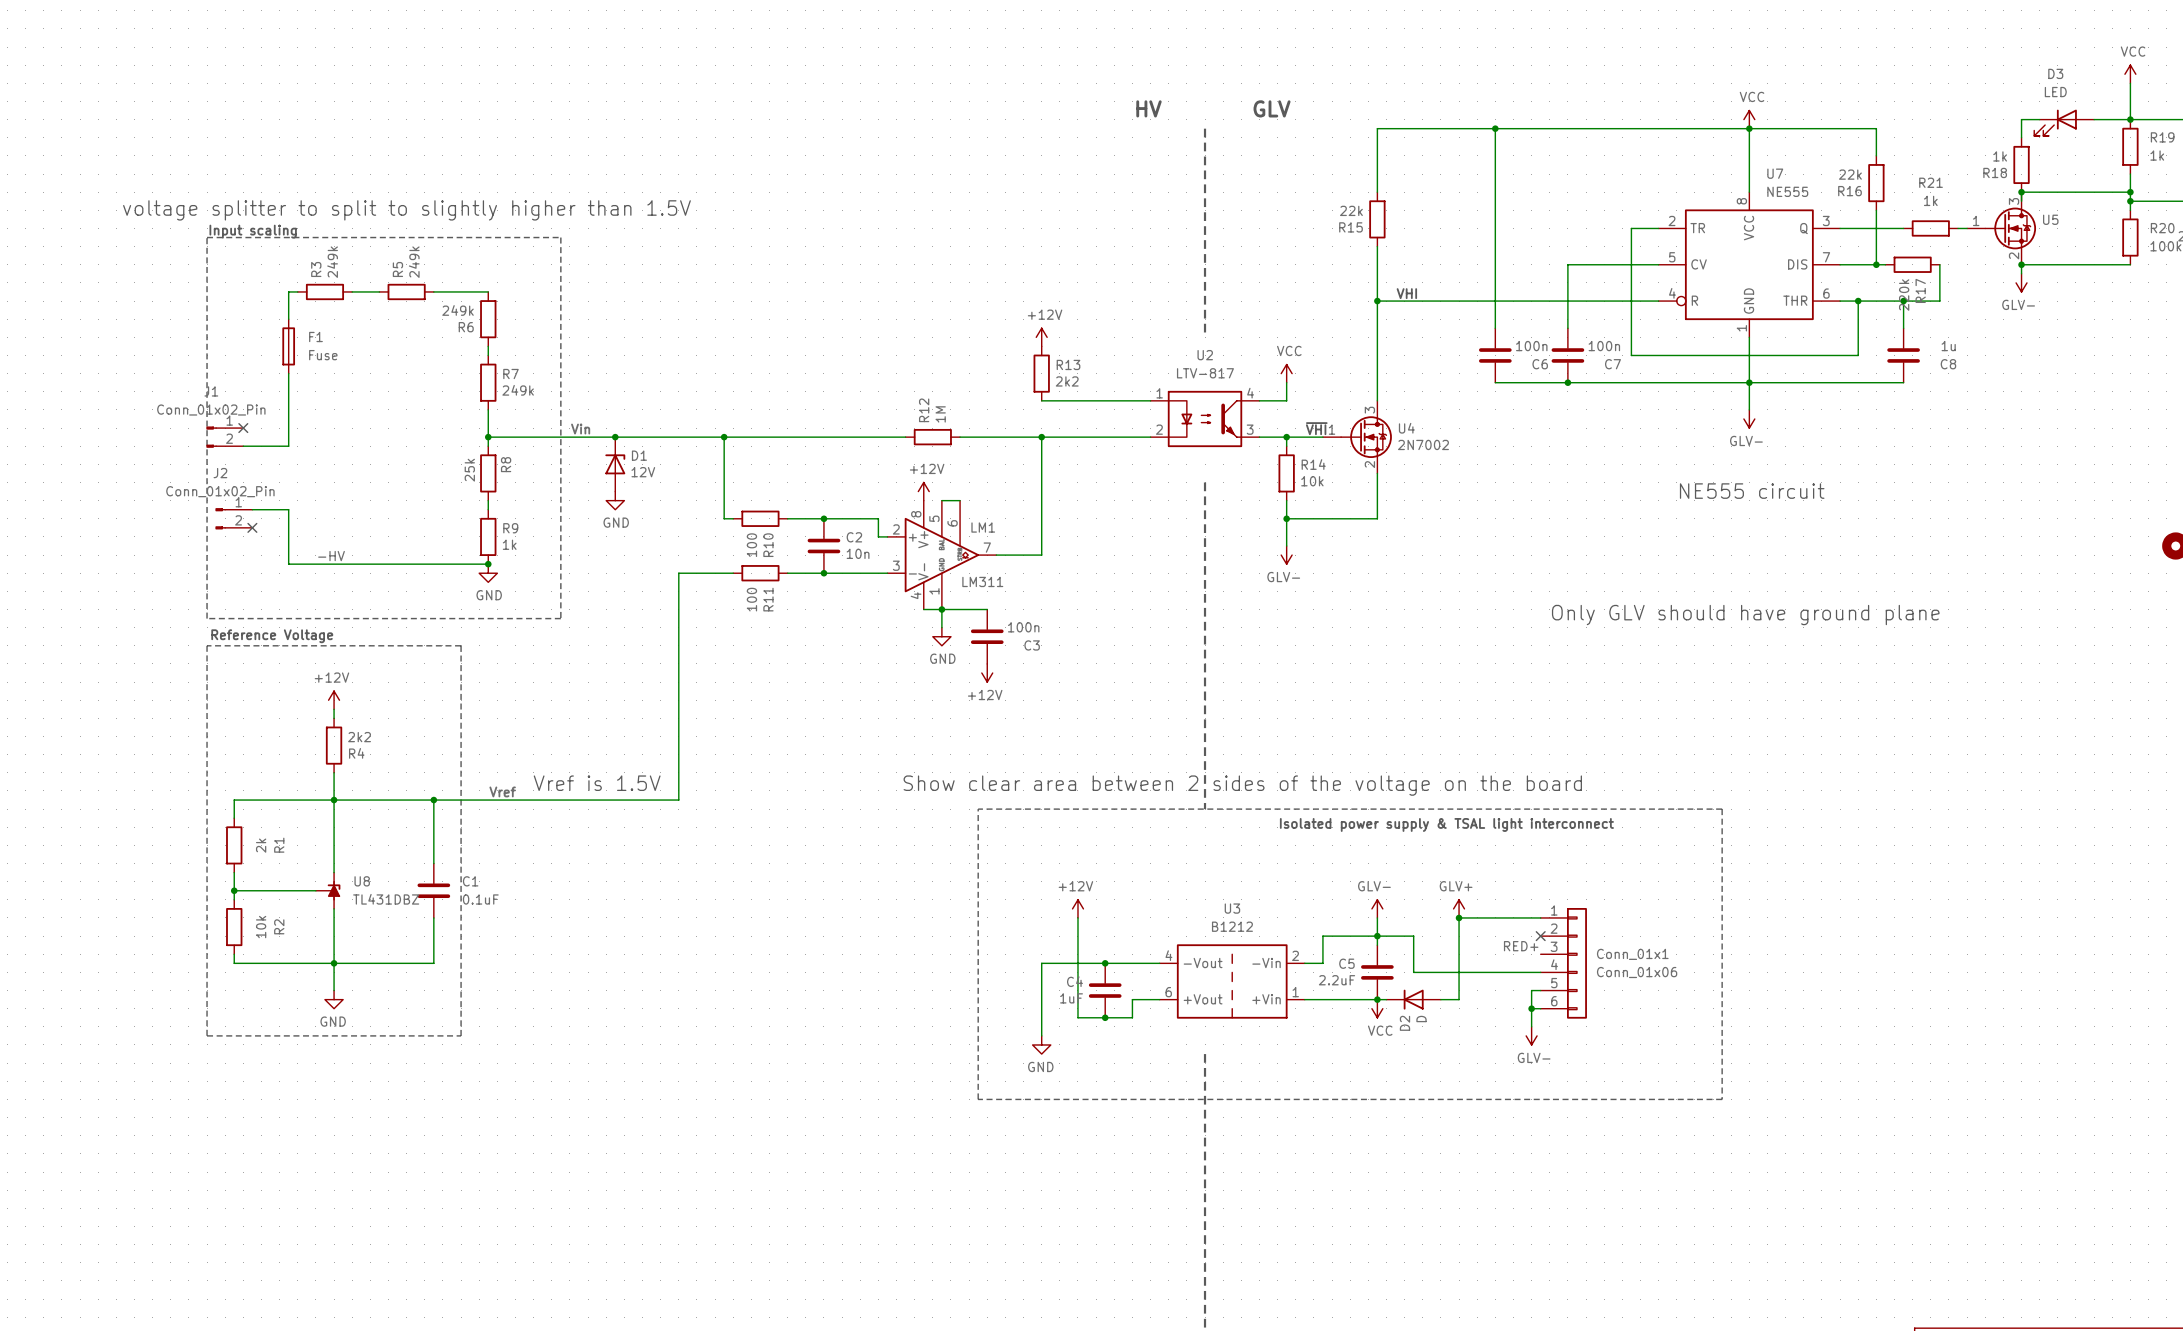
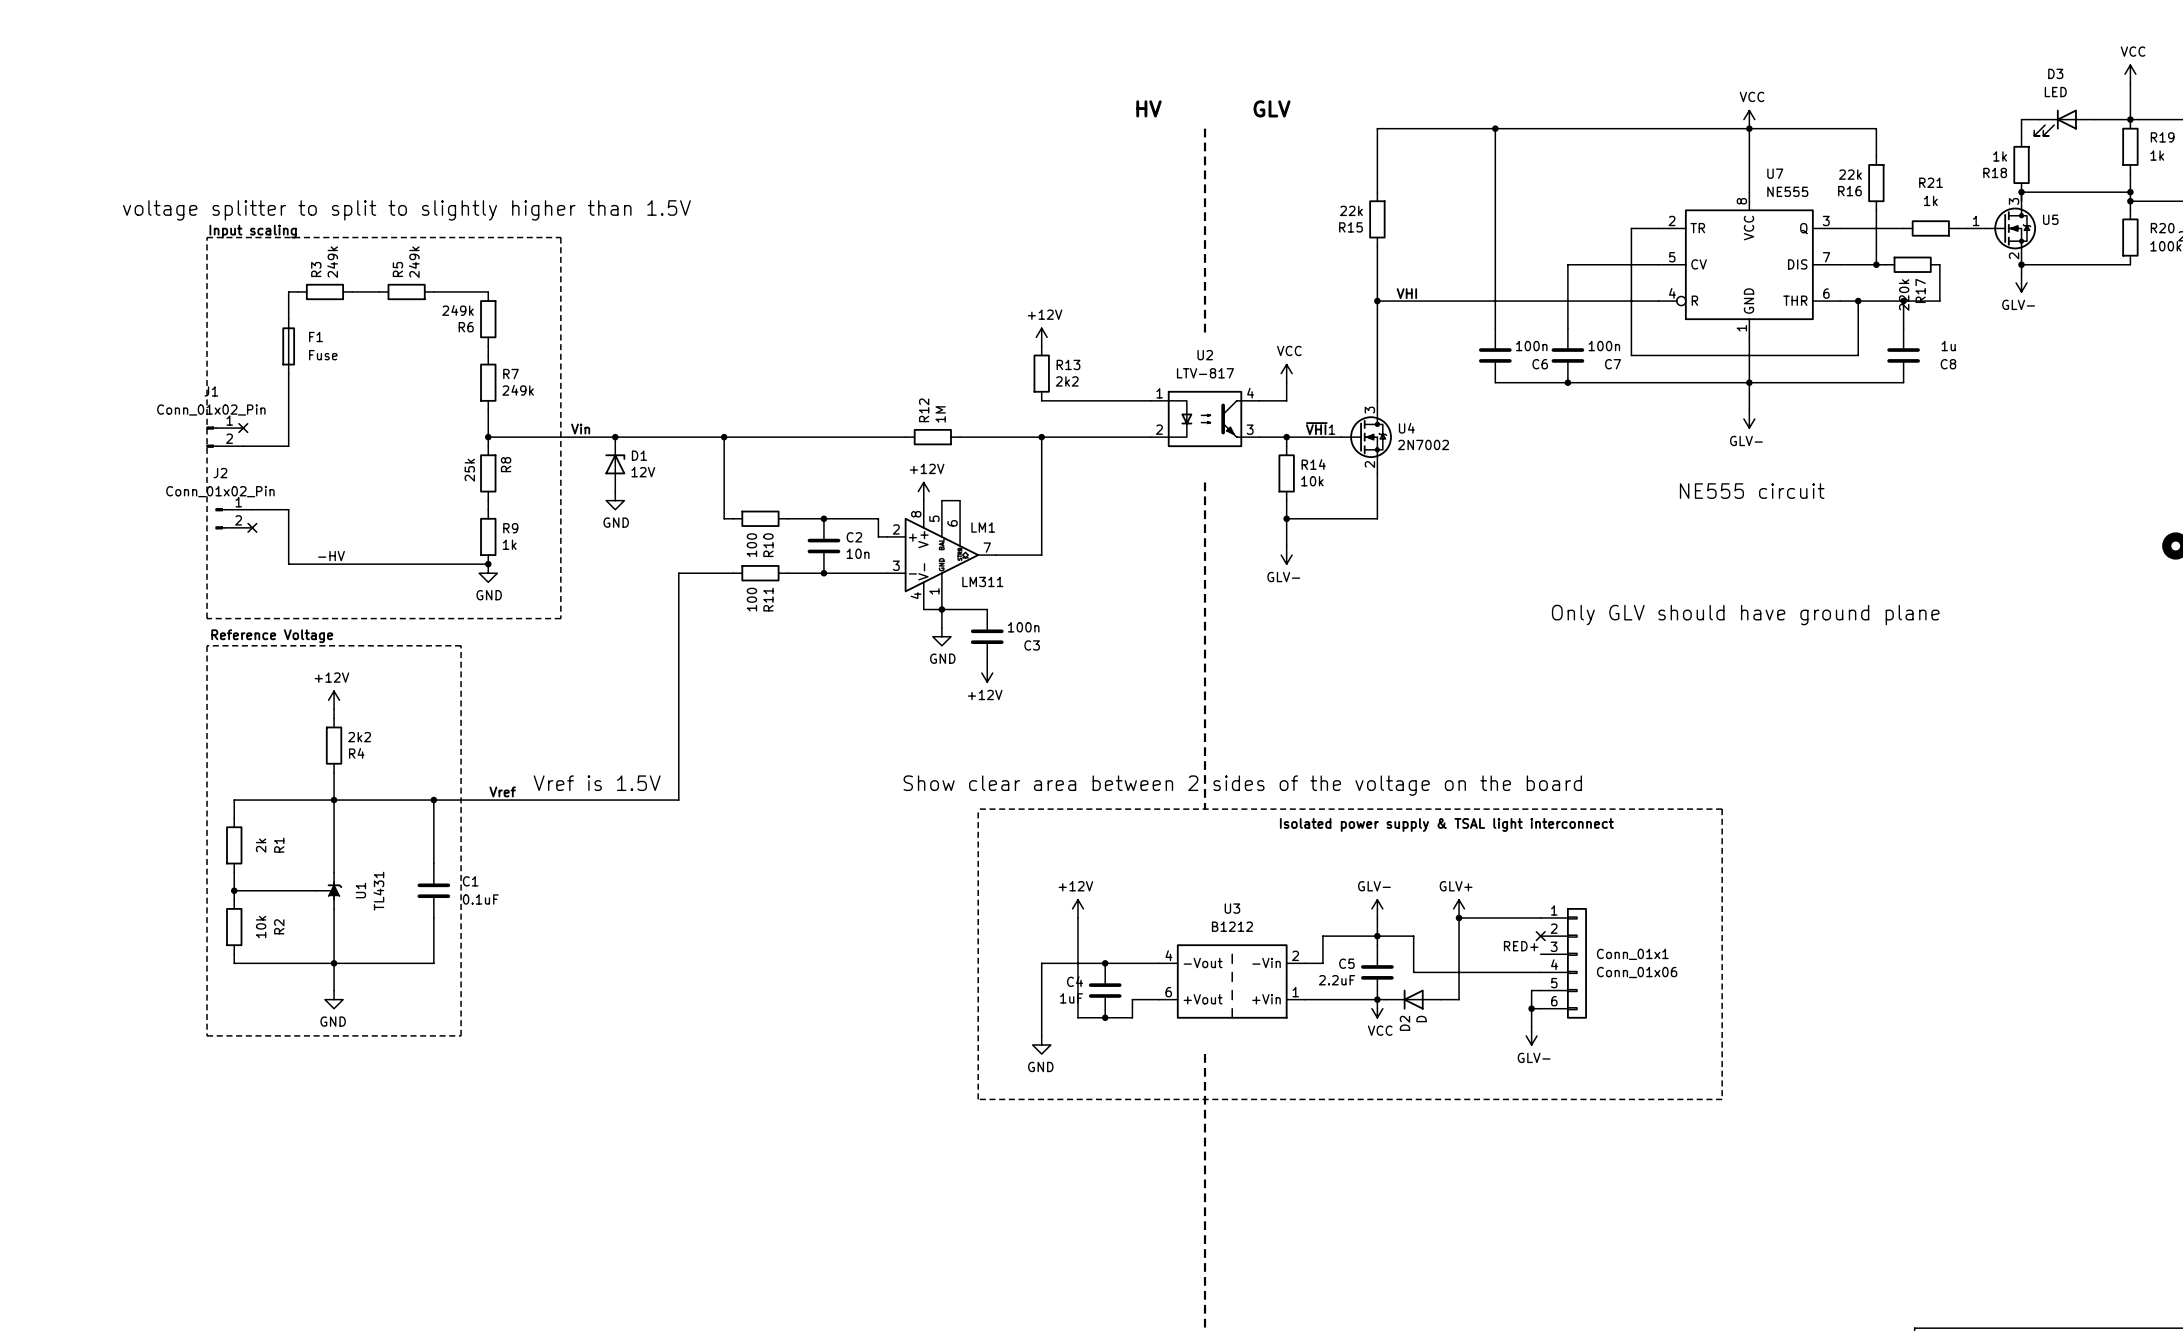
U8: TL431DBZ (328, 890) -> none
U1: none -> TL431 (329, 890)

